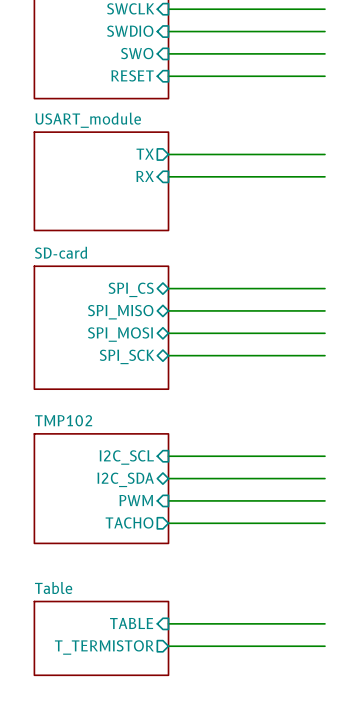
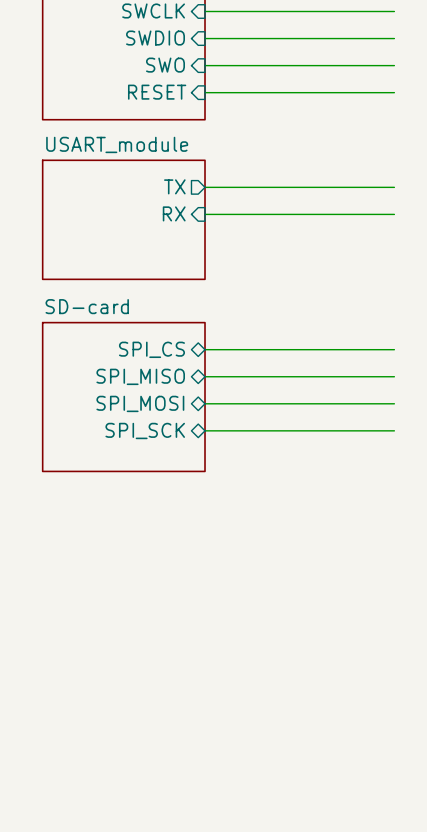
wire: (168, 456) (324, 456) -> none
sheet pin: I2C_SCL (126, 457) -> none
wire: (168, 478) (324, 478) -> none
sheet pin: I2C_SDA (125, 479) -> none
sheet TMP102: (101, 488) -> none
sheet pin: PWM (136, 500) -> none
wire: (168, 500) (324, 500) -> none
sheet pin: TACHO (129, 522) -> none
wire: (168, 523) (324, 523) -> none
sheet pin: TABLE (131, 623) -> none
wire: (168, 623) (324, 623) -> none
sheet Table: (101, 638) -> none
wire: (168, 646) (324, 646) -> none
sheet pin: T_TERMISTOR (104, 647) -> none

